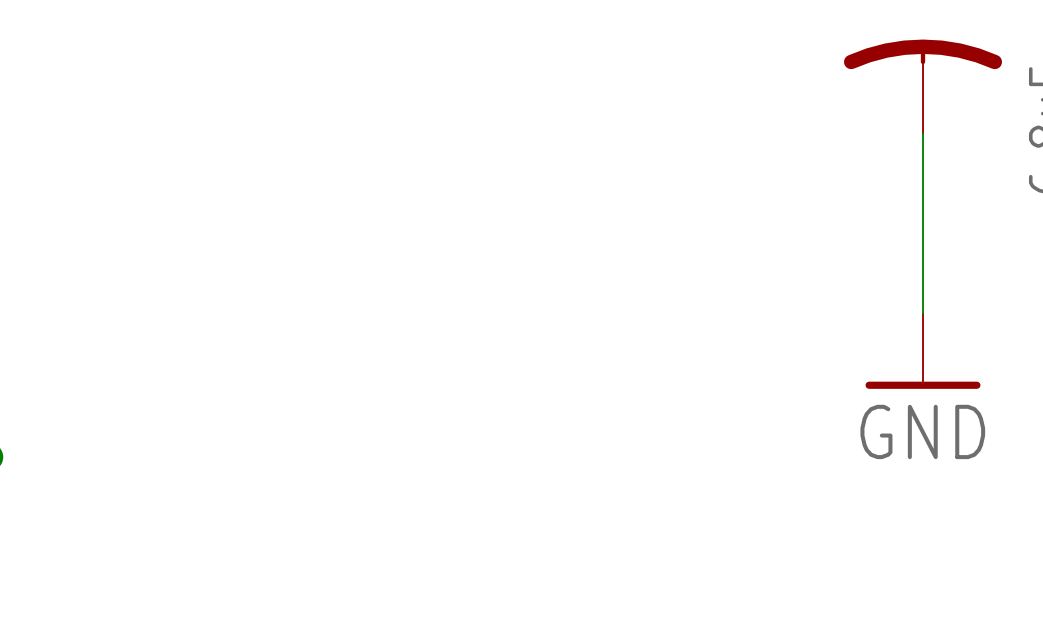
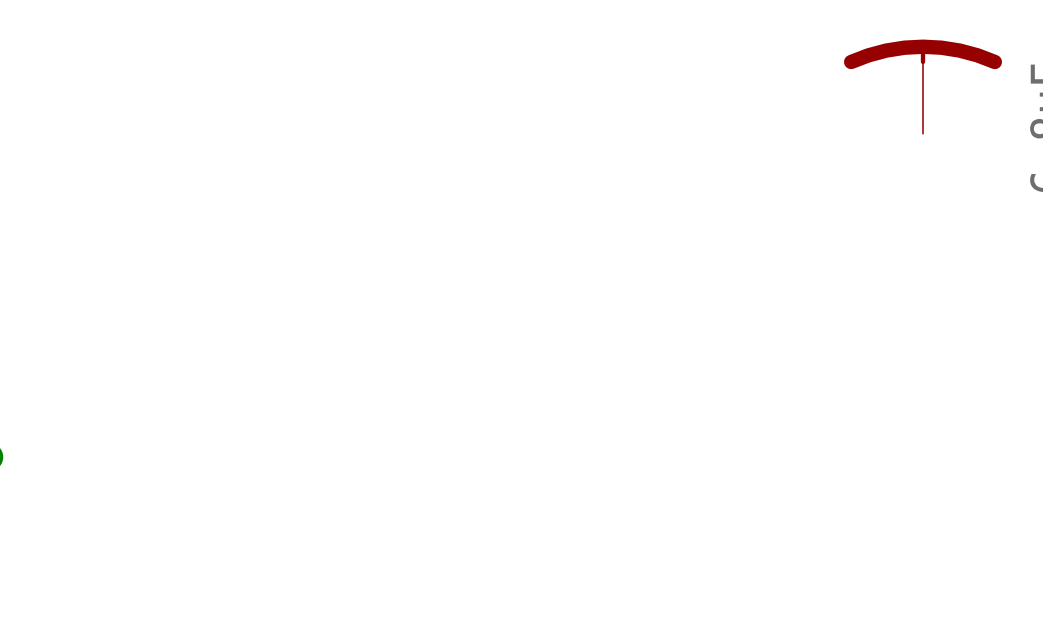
wire: (923, 133) (923, 313) -> none
power symbol: GND (923, 351) -> none

